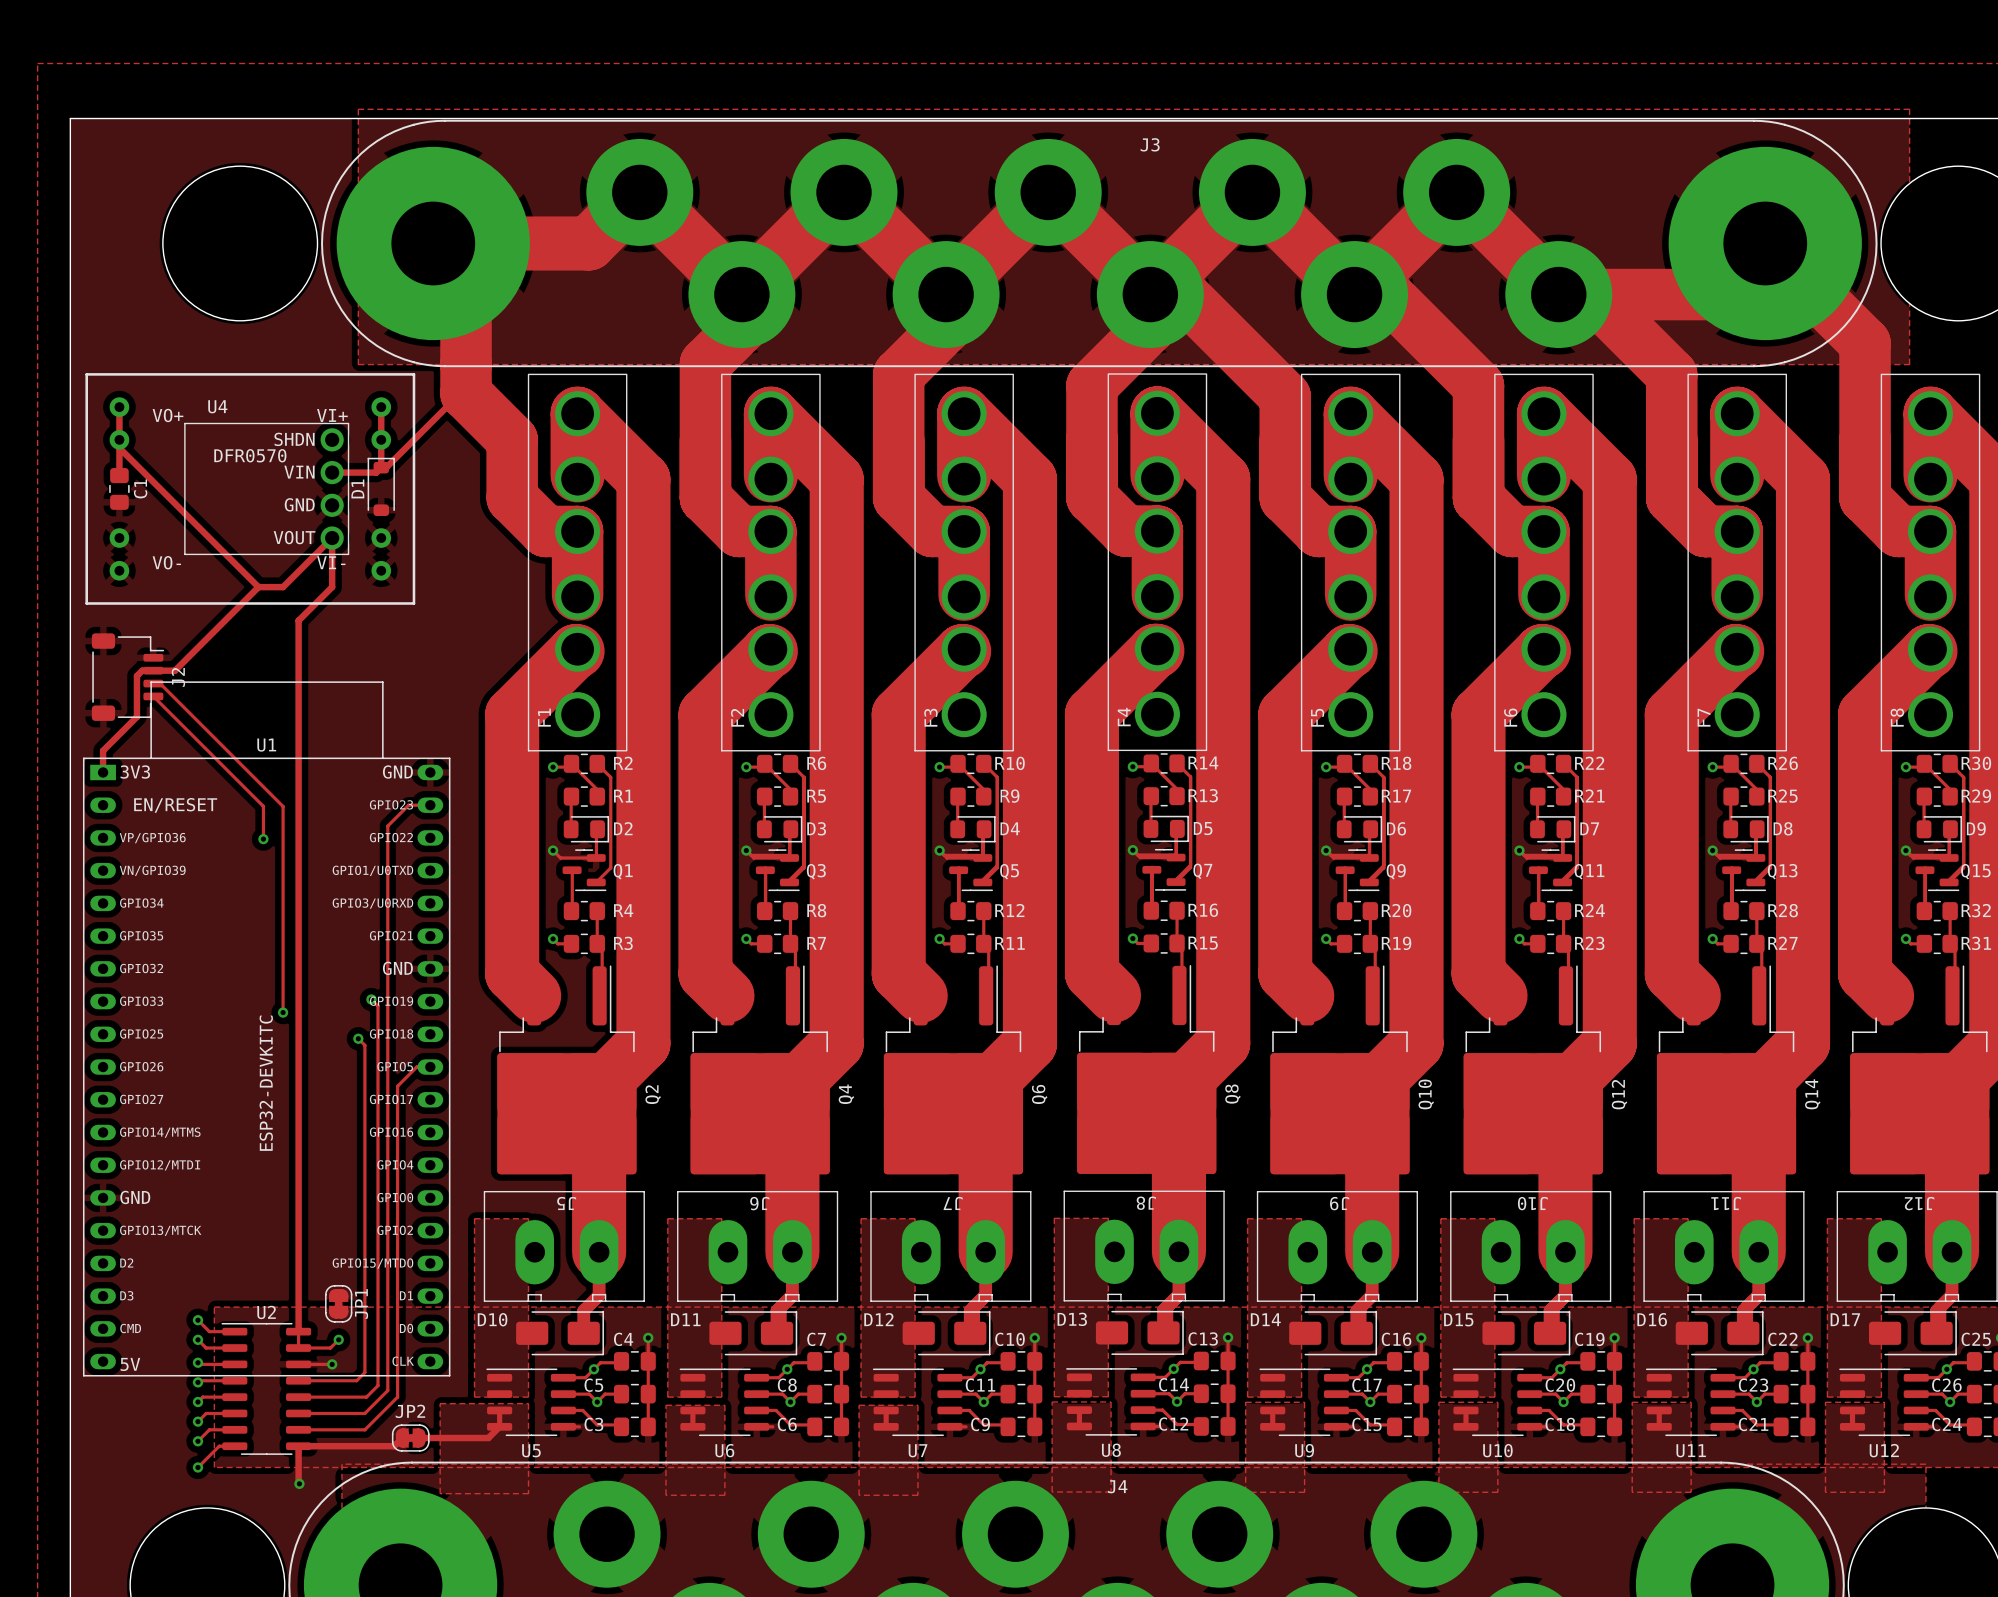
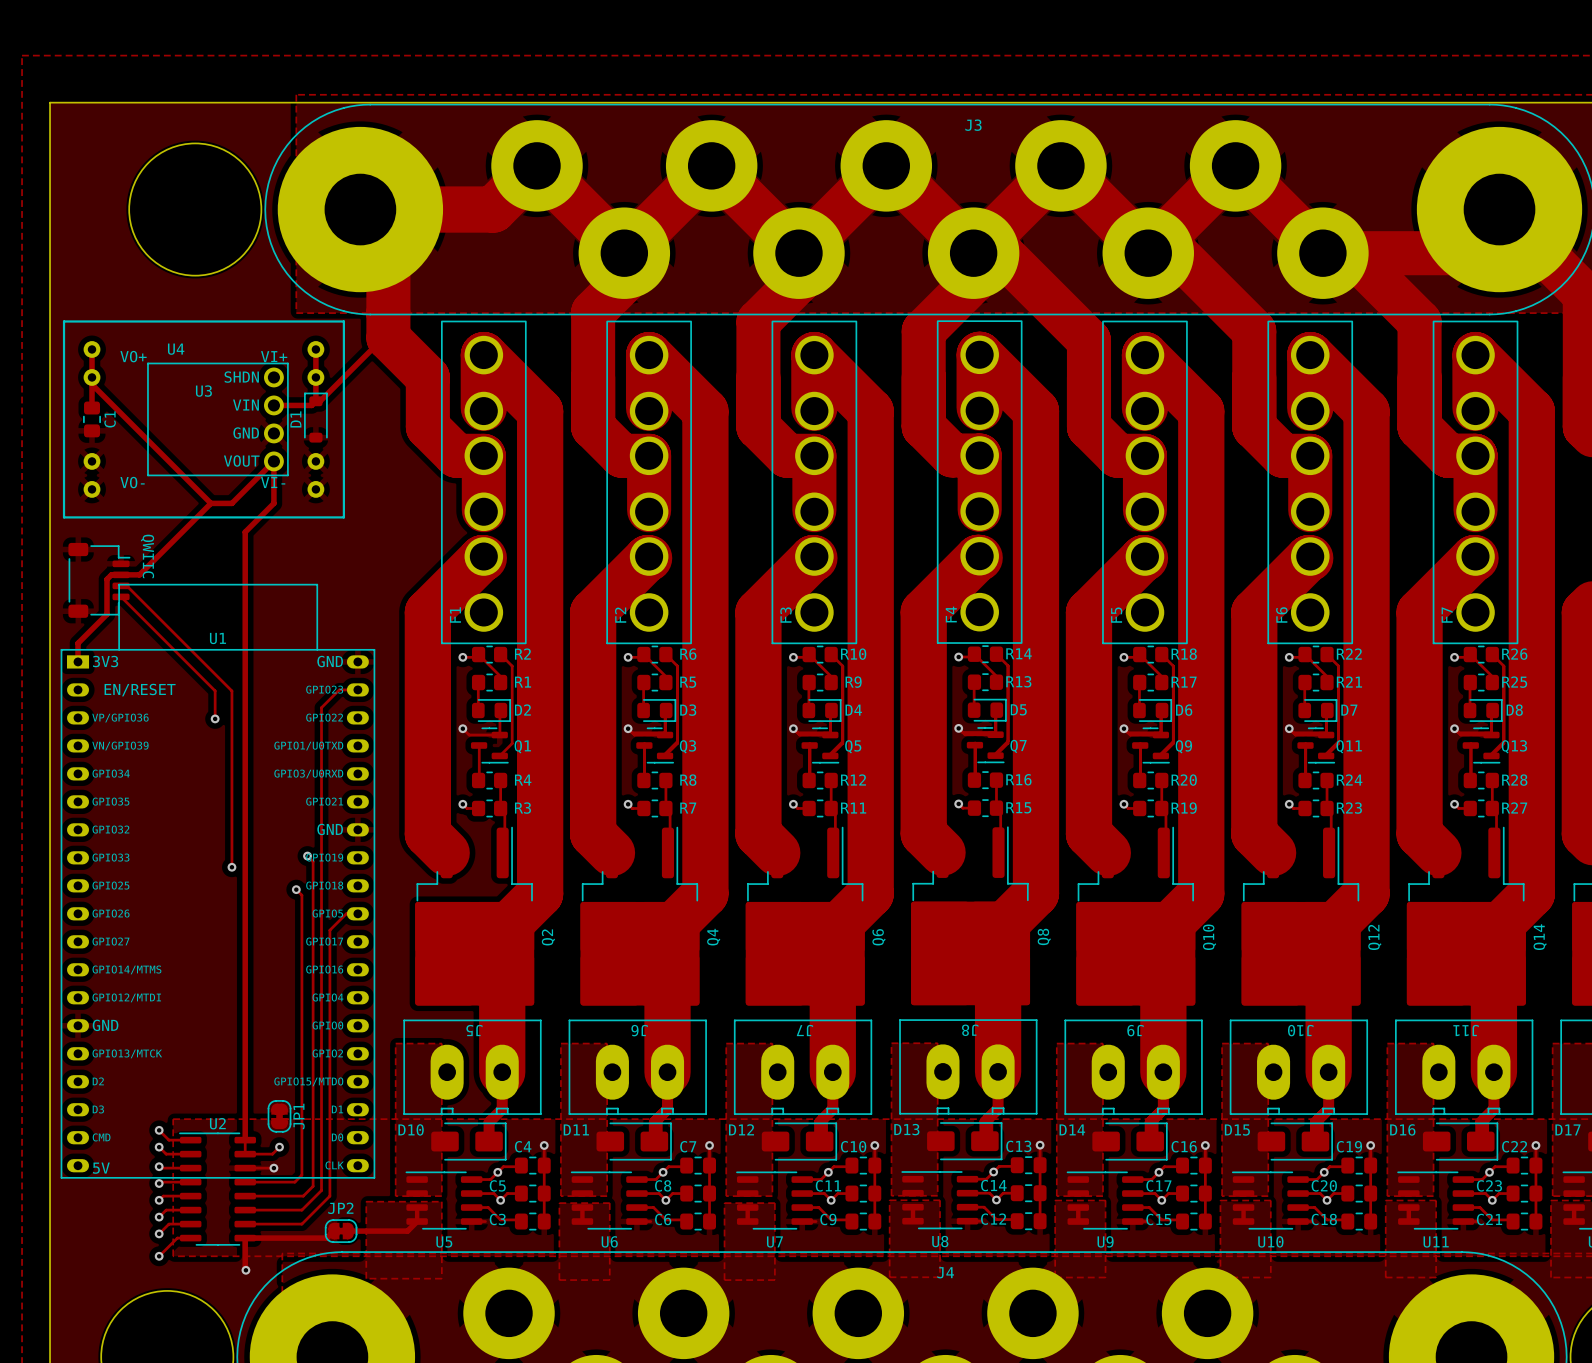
DFR0570 name: DFR0570 (250, 455) -> U3 (203, 391)
J2 name: J2 (178, 677) -> QWIIC (147, 556)
U1 value: ESP32-DEVKITC (266, 1083) -> none

